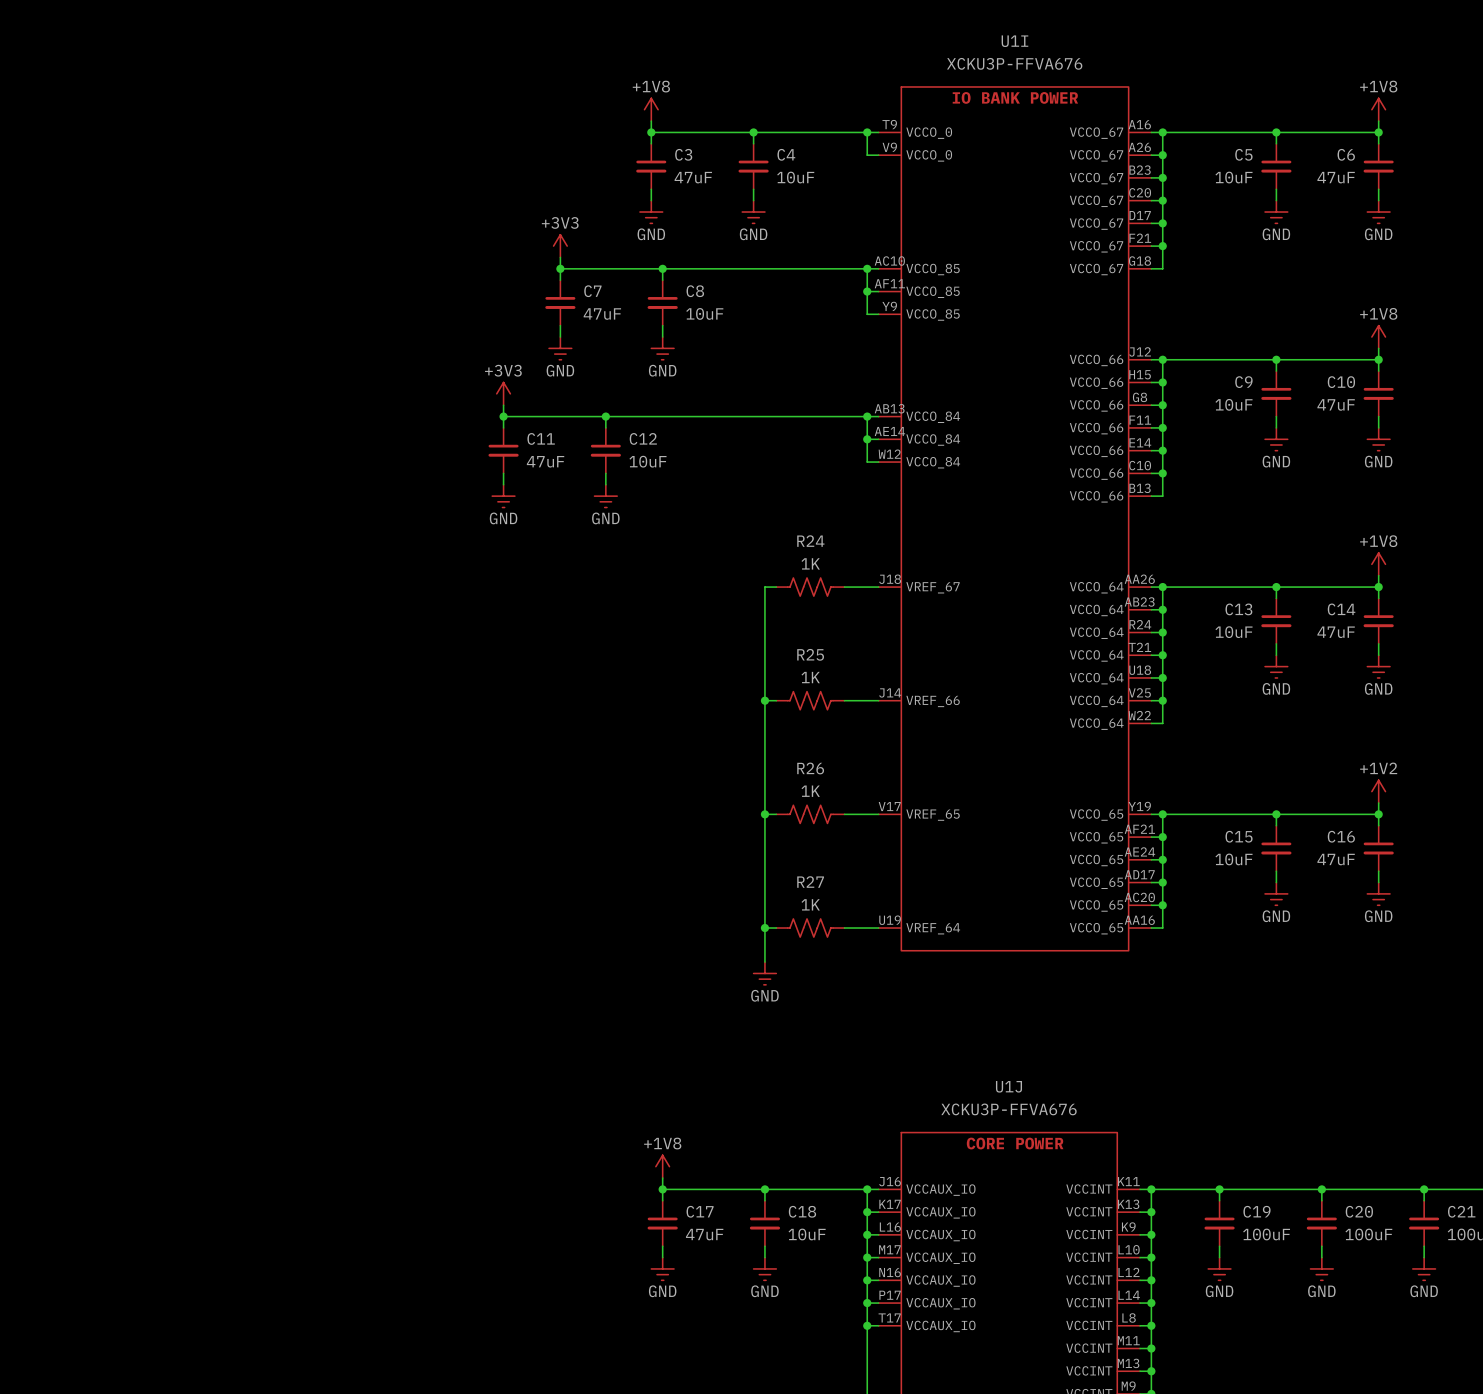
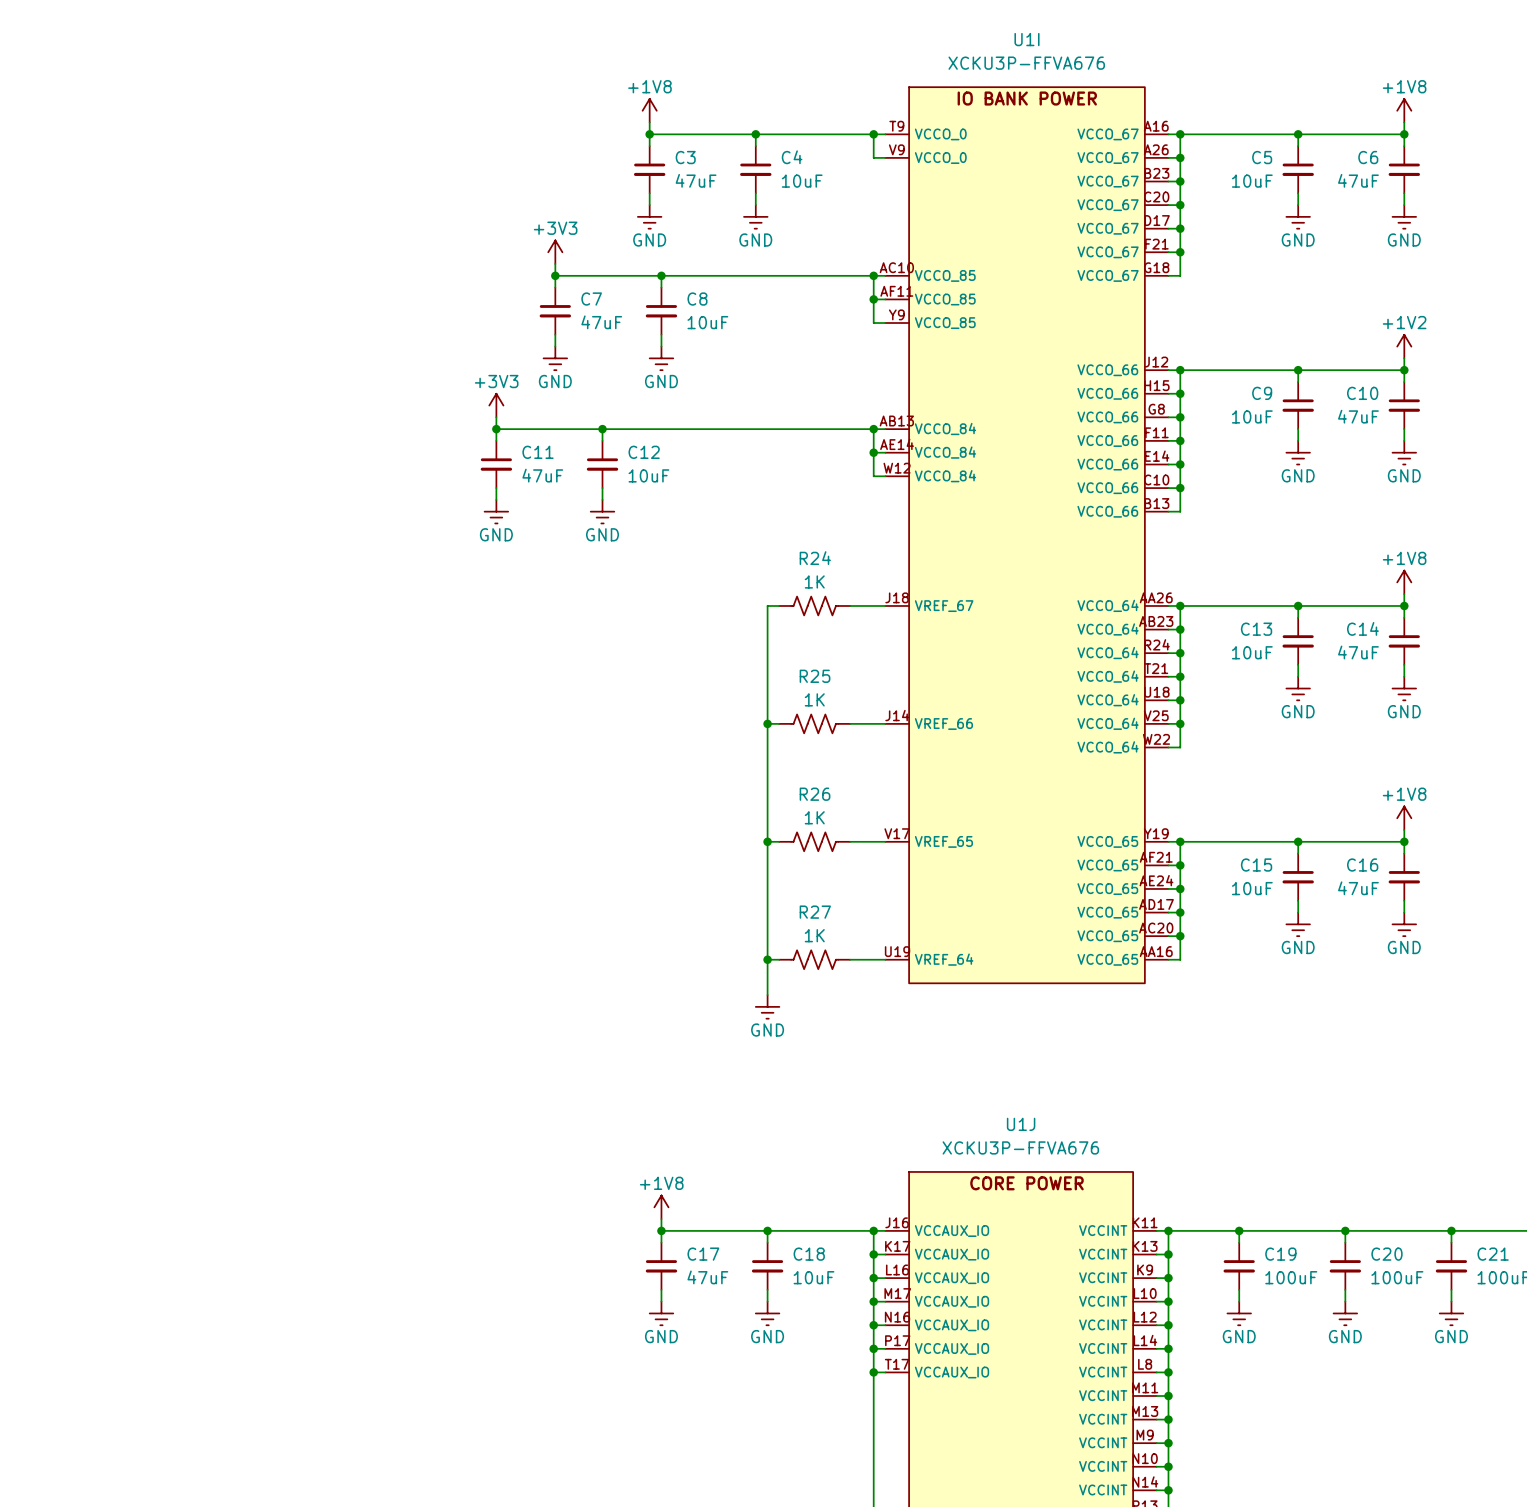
power symbol: +1V8 (1378, 337) -> +1V2 (1404, 346)
power symbol: +1V2 (1378, 791) -> +1V8 (1404, 818)

